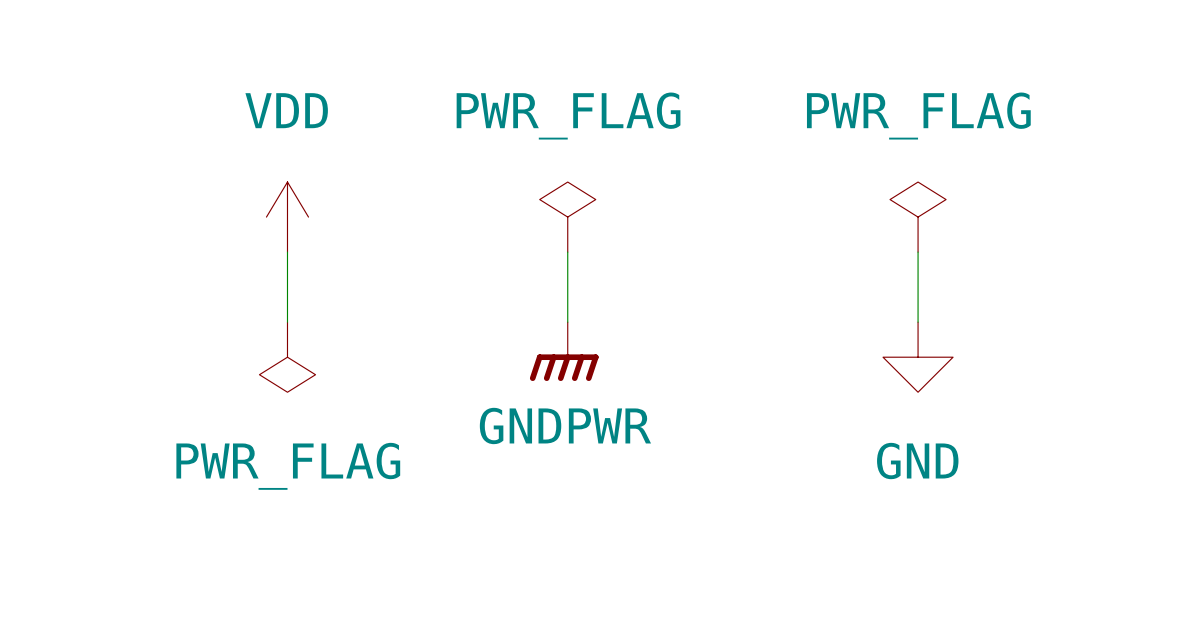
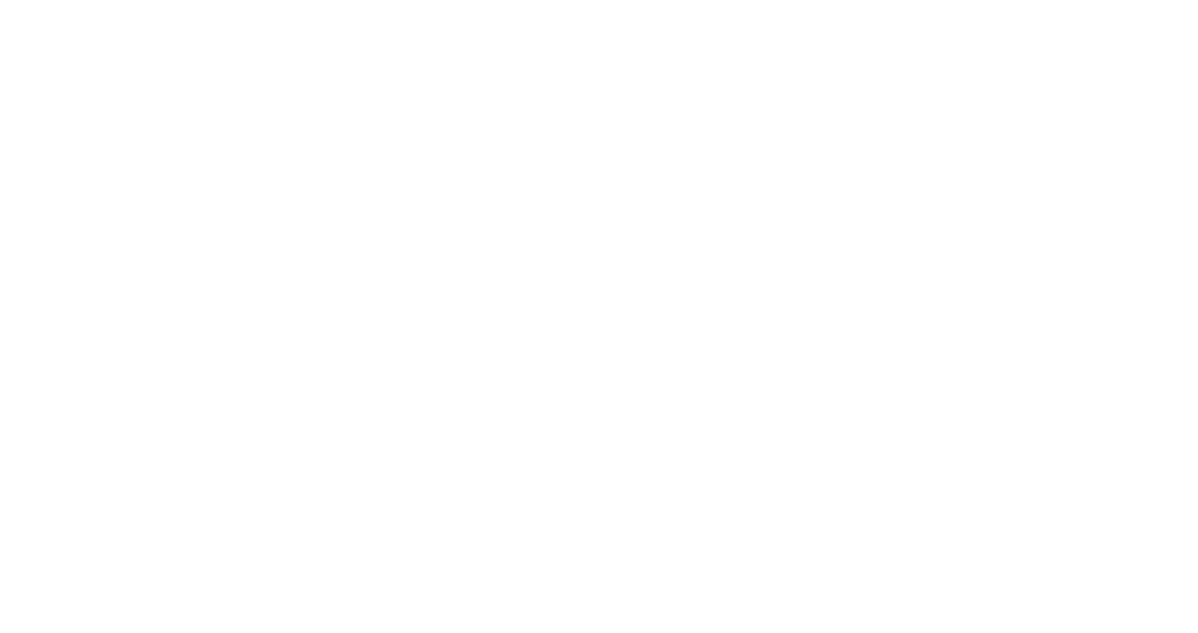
power symbol: VDD (287, 217) -> none
power symbol: PWR_FLAG (567, 217) -> none
power symbol: PWR_FLAG (918, 217) -> none
wire: (287, 252) (287, 322) -> none
wire: (567, 252) (567, 322) -> none
wire: (918, 252) (918, 322) -> none
power symbol: GNDPWR (564, 351) -> none
power symbol: PWR_FLAG (287, 357) -> none
power symbol: GND (918, 357) -> none

